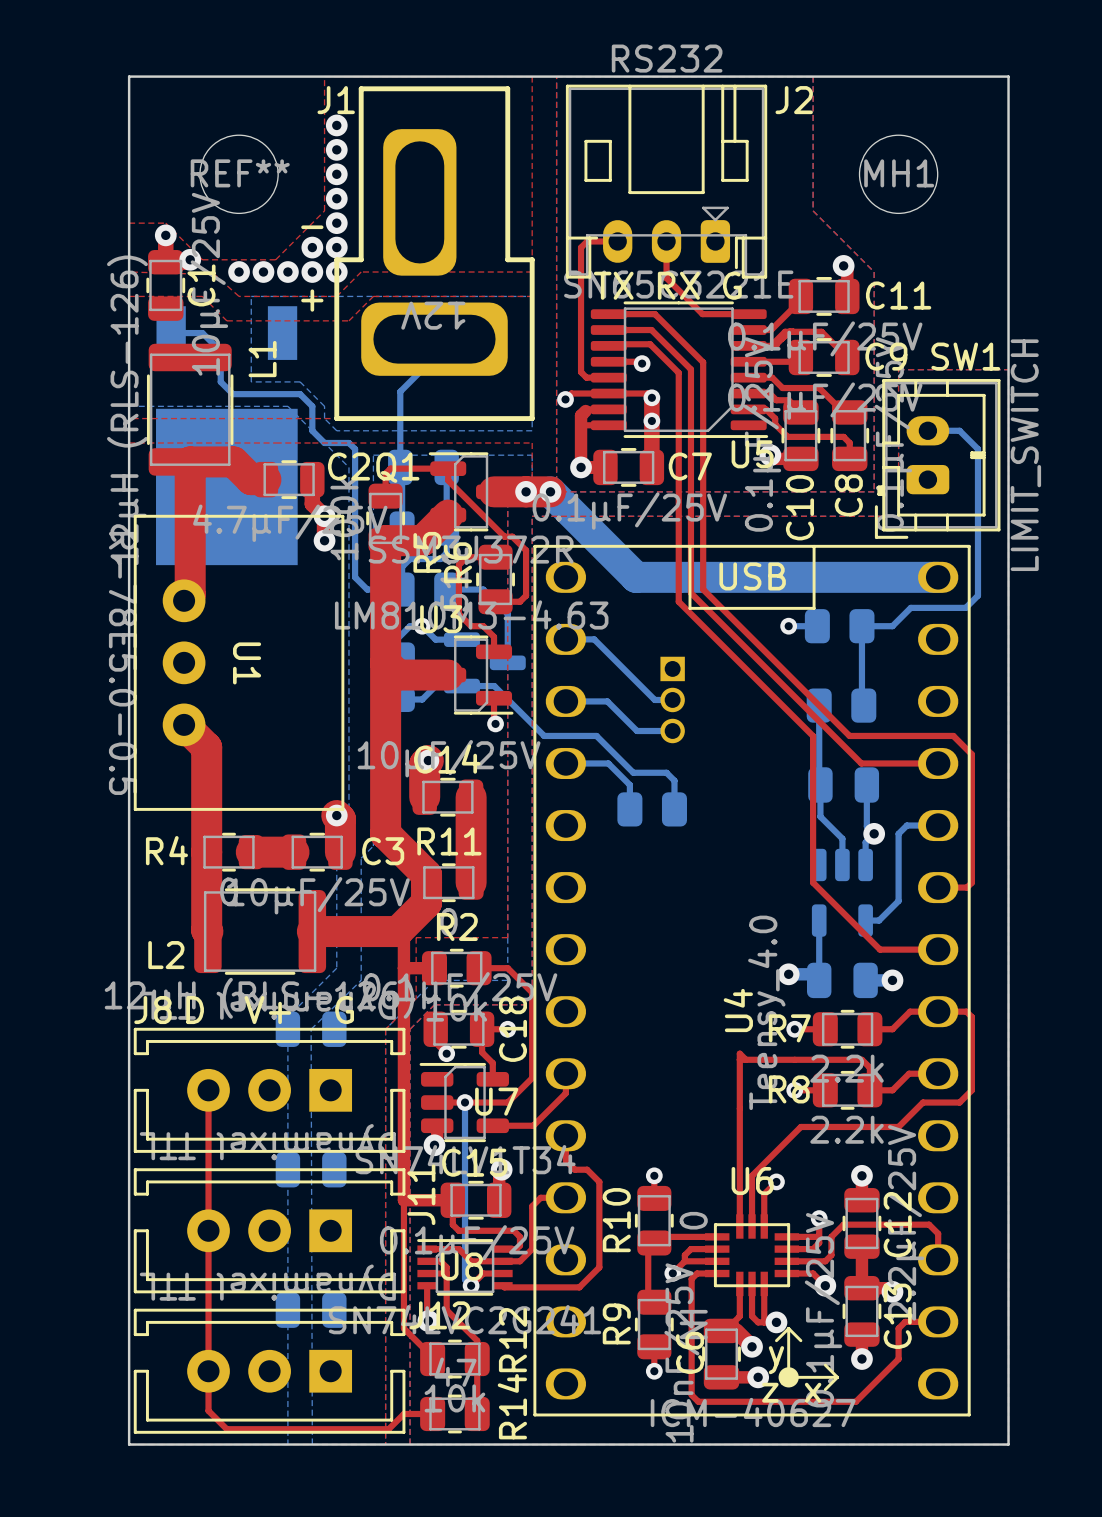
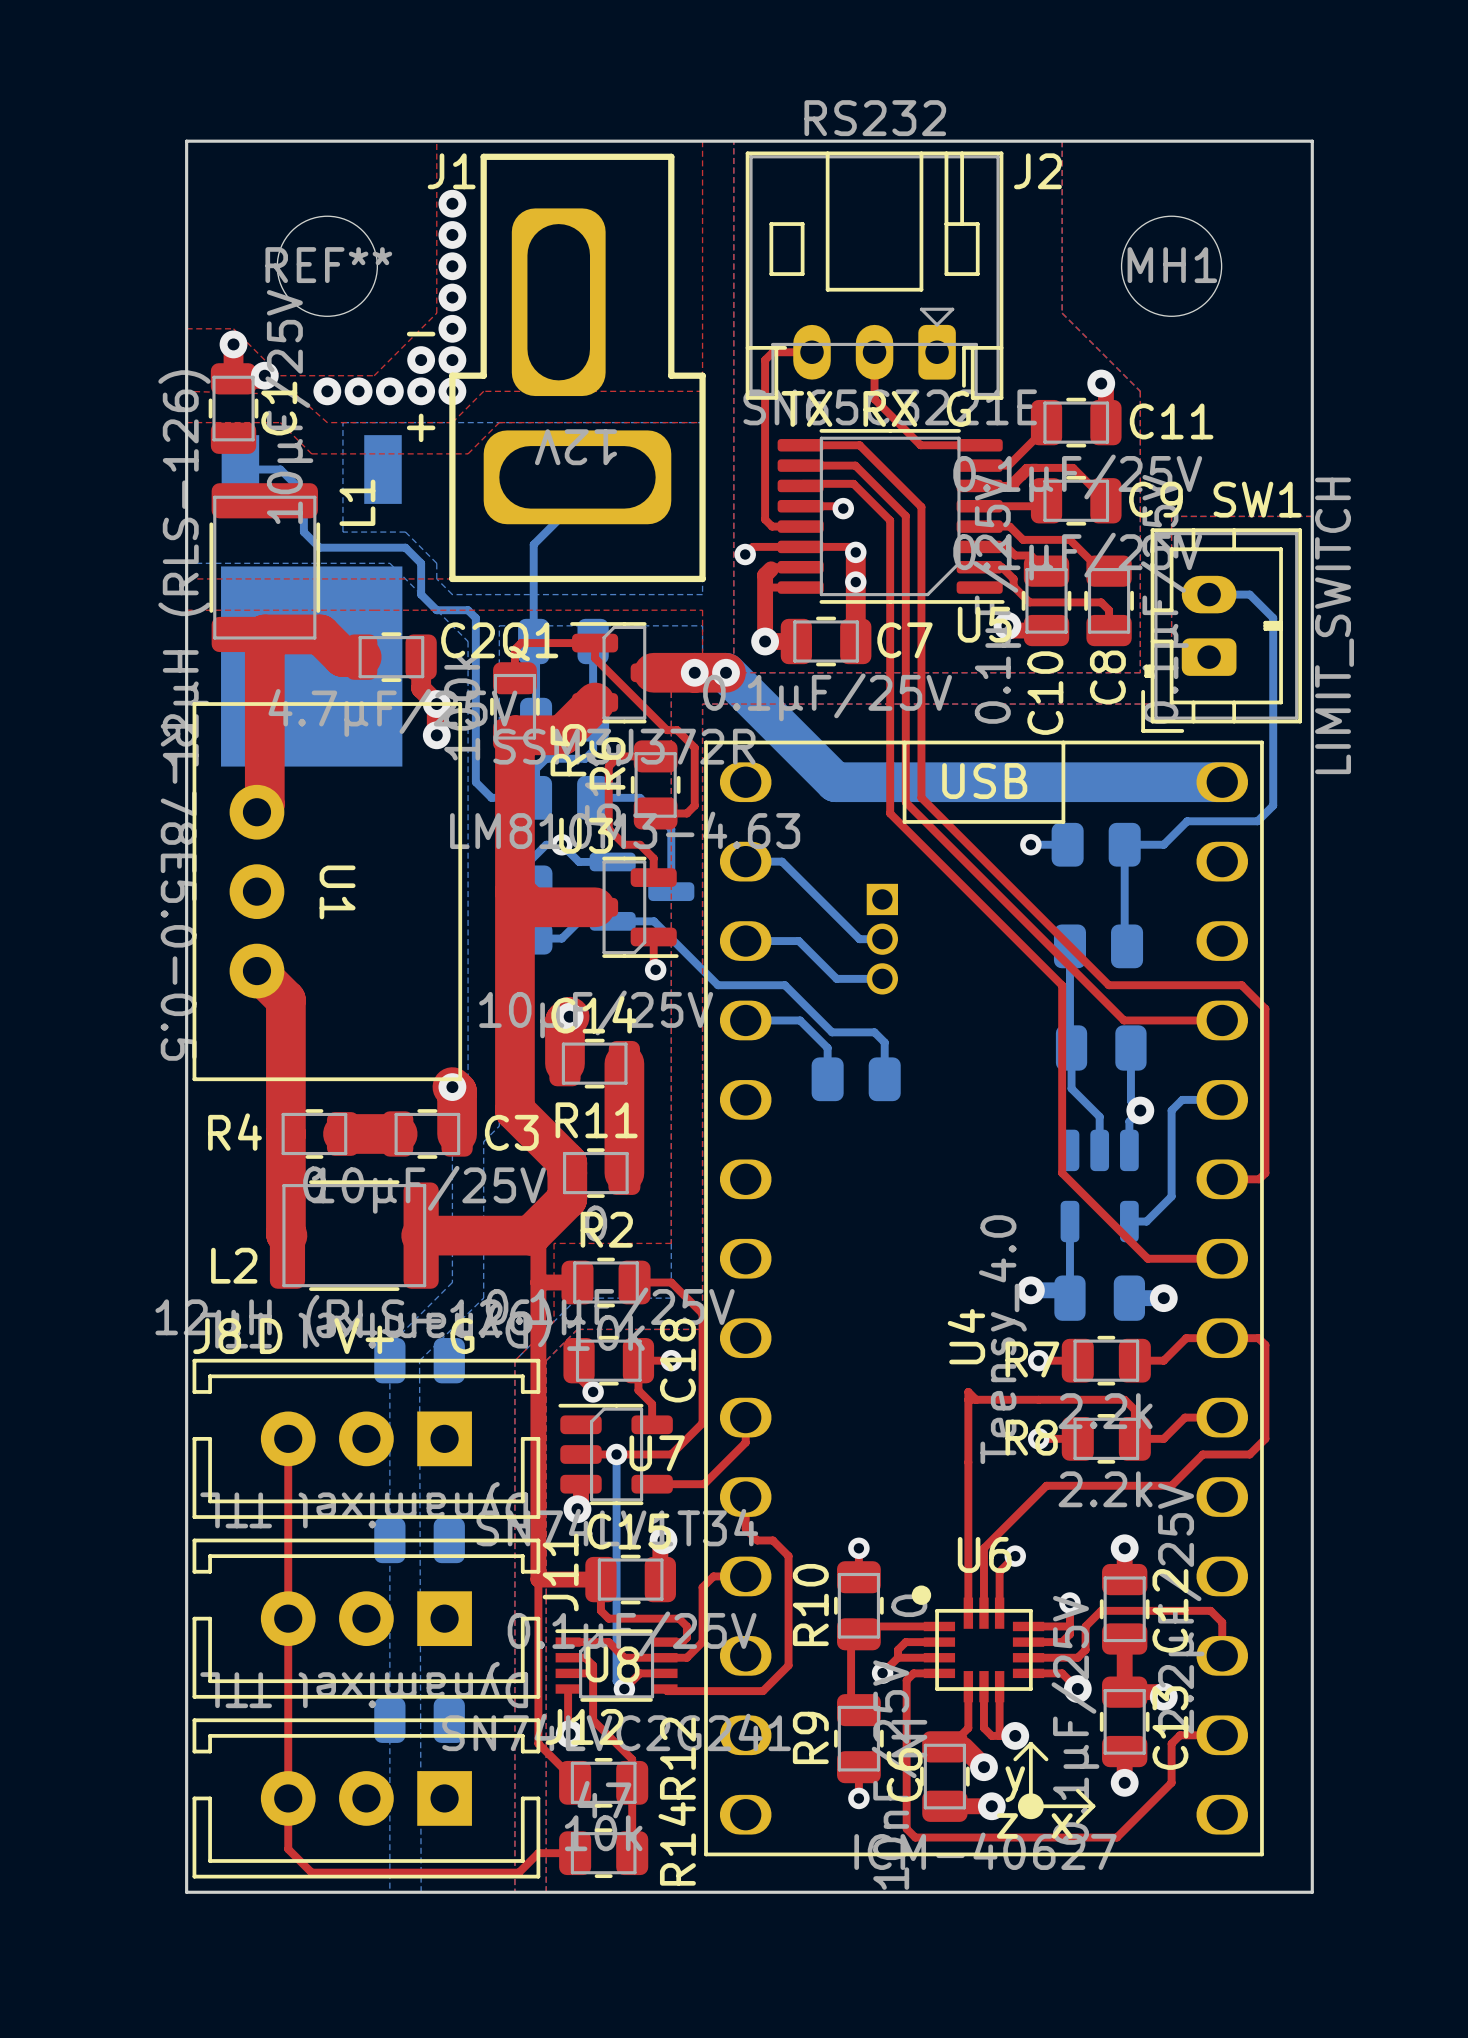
U6 footprint: [705, 1214, 840, 1392] -> [911, 1585, 1096, 1824]

